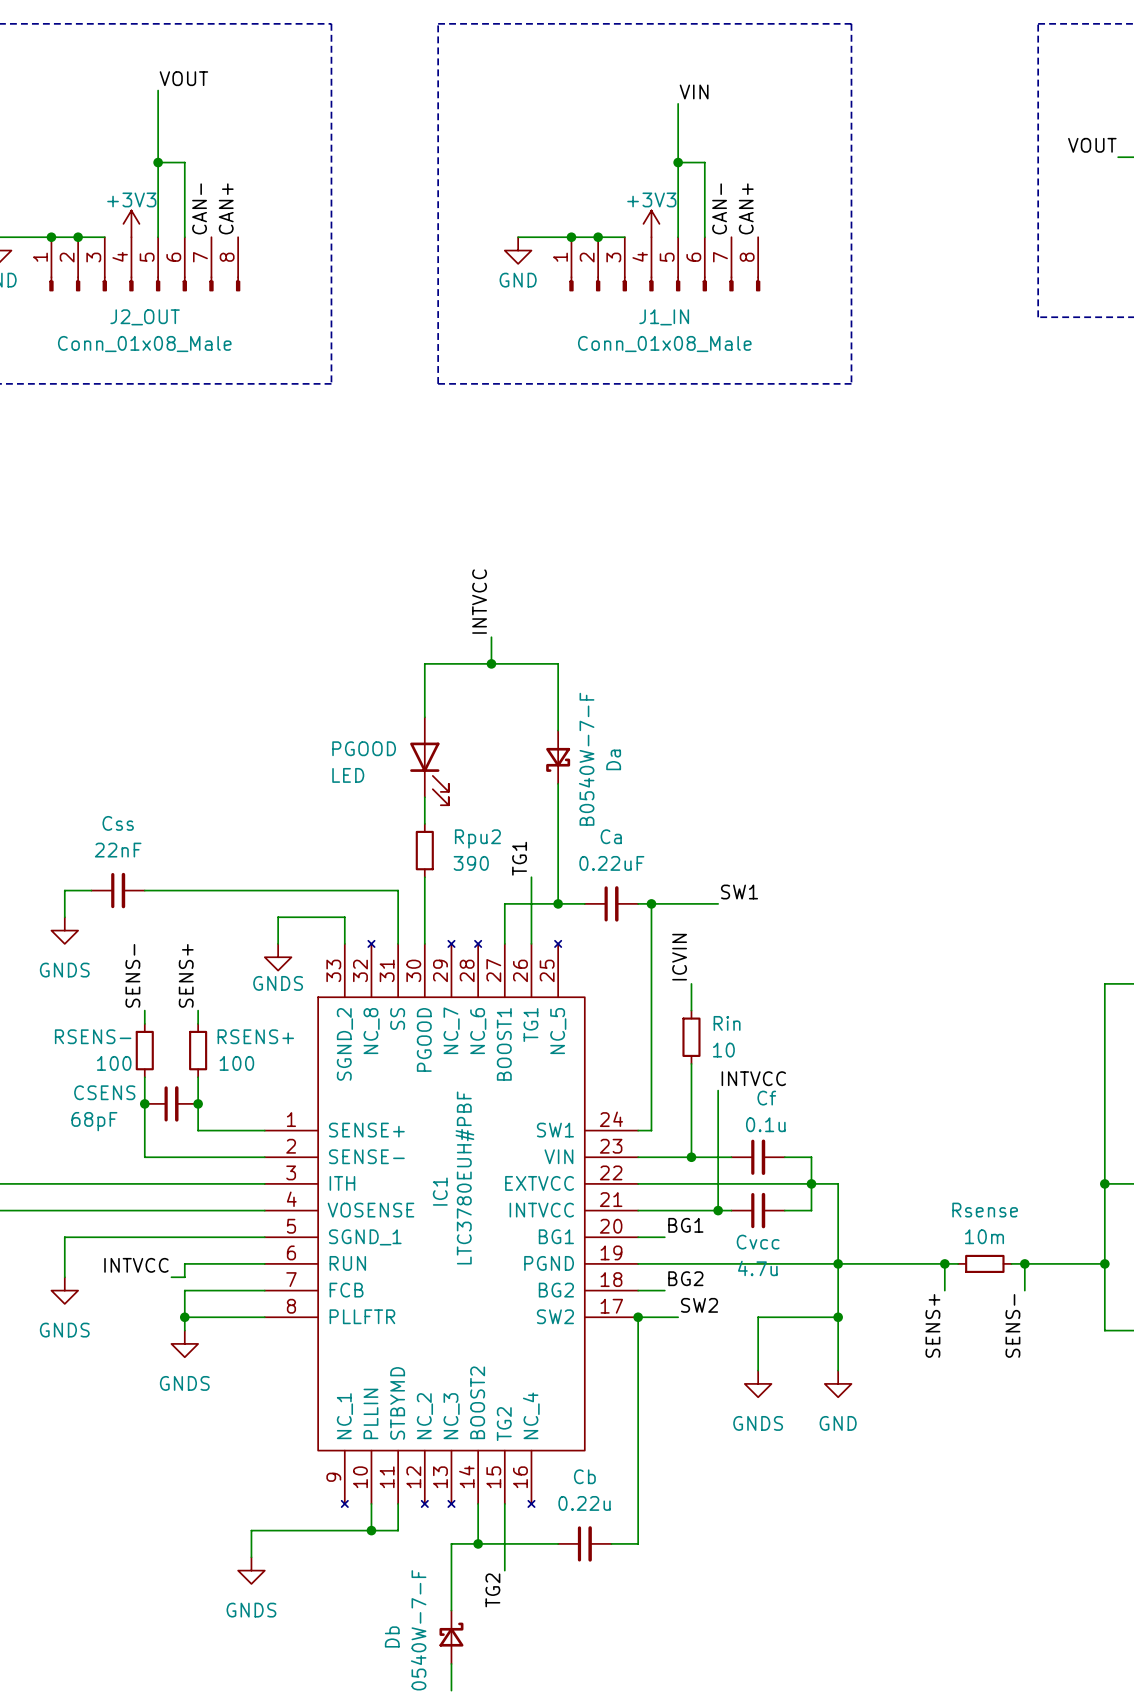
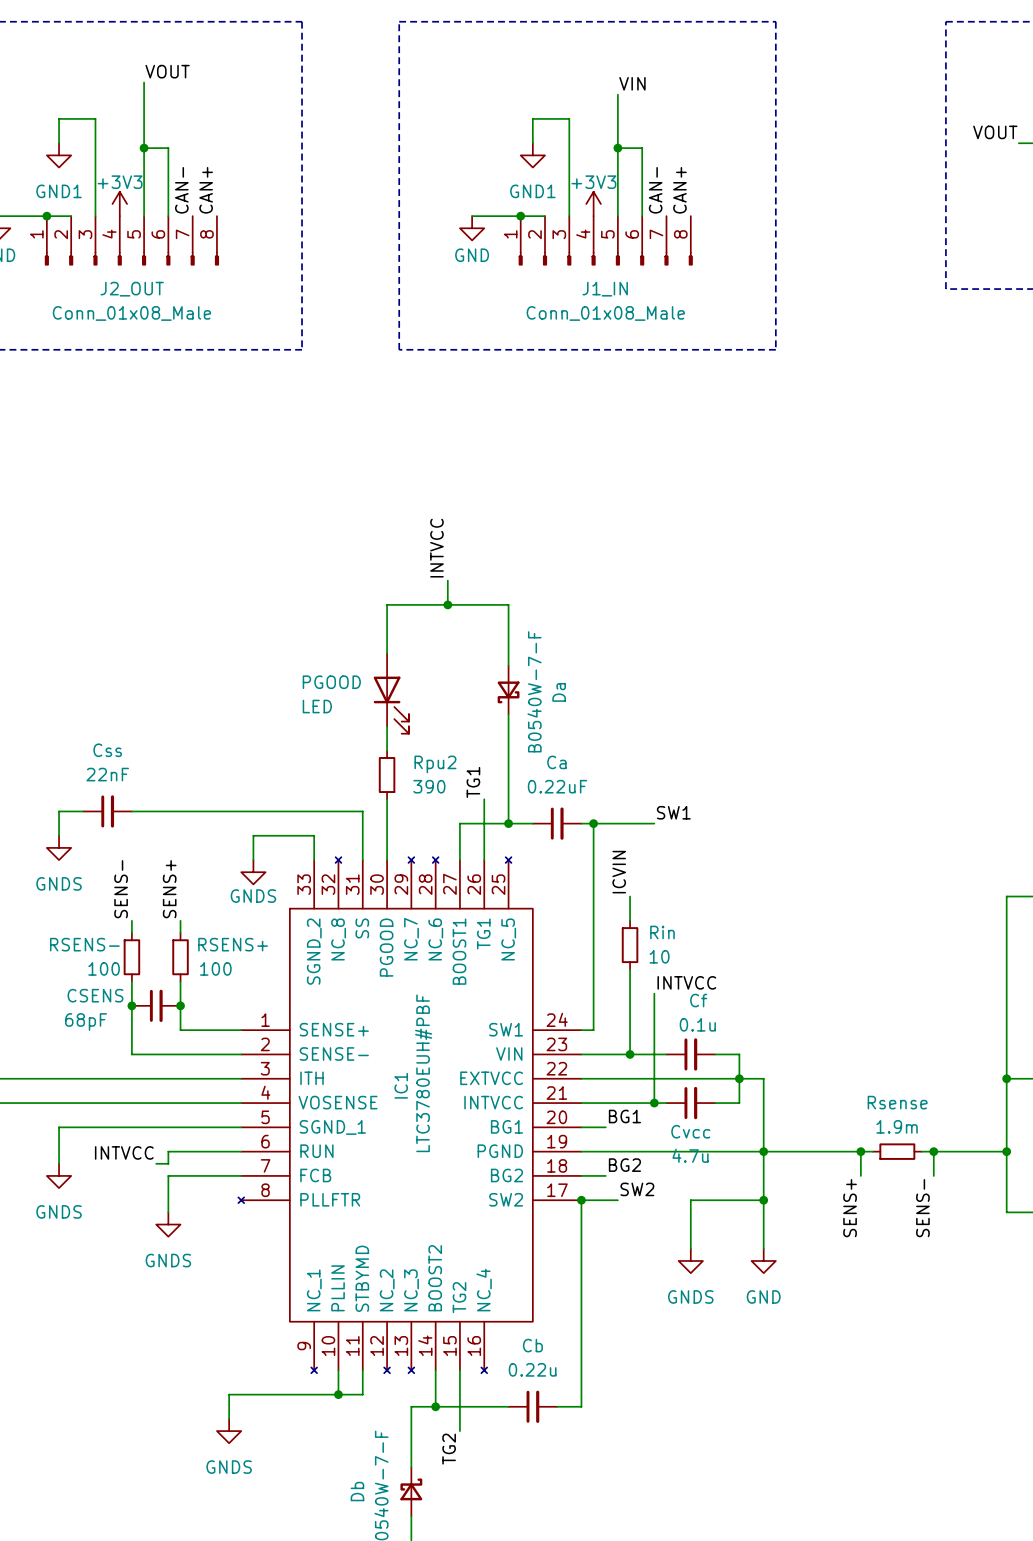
power symbol: none -> GND1 (59, 155)
power symbol: none -> GND1 (532, 155)
wire: (78, 237) (104, 237) -> (59, 143) (59, 118) (95, 118) (95, 216)
junction: (78, 237) -> none
wire: (598, 237) (624, 237) -> (532, 143) (532, 118) (569, 118) (569, 216)
junction: (598, 237) -> none
IC1 symbol: [264, 940, 639, 1508] -> [238, 857, 582, 1374]
Rsense value: 10m (984, 1236) -> 1.9m (897, 1126)
wire: (184, 1317) (264, 1317) -> none
junction: (184, 1317) -> none

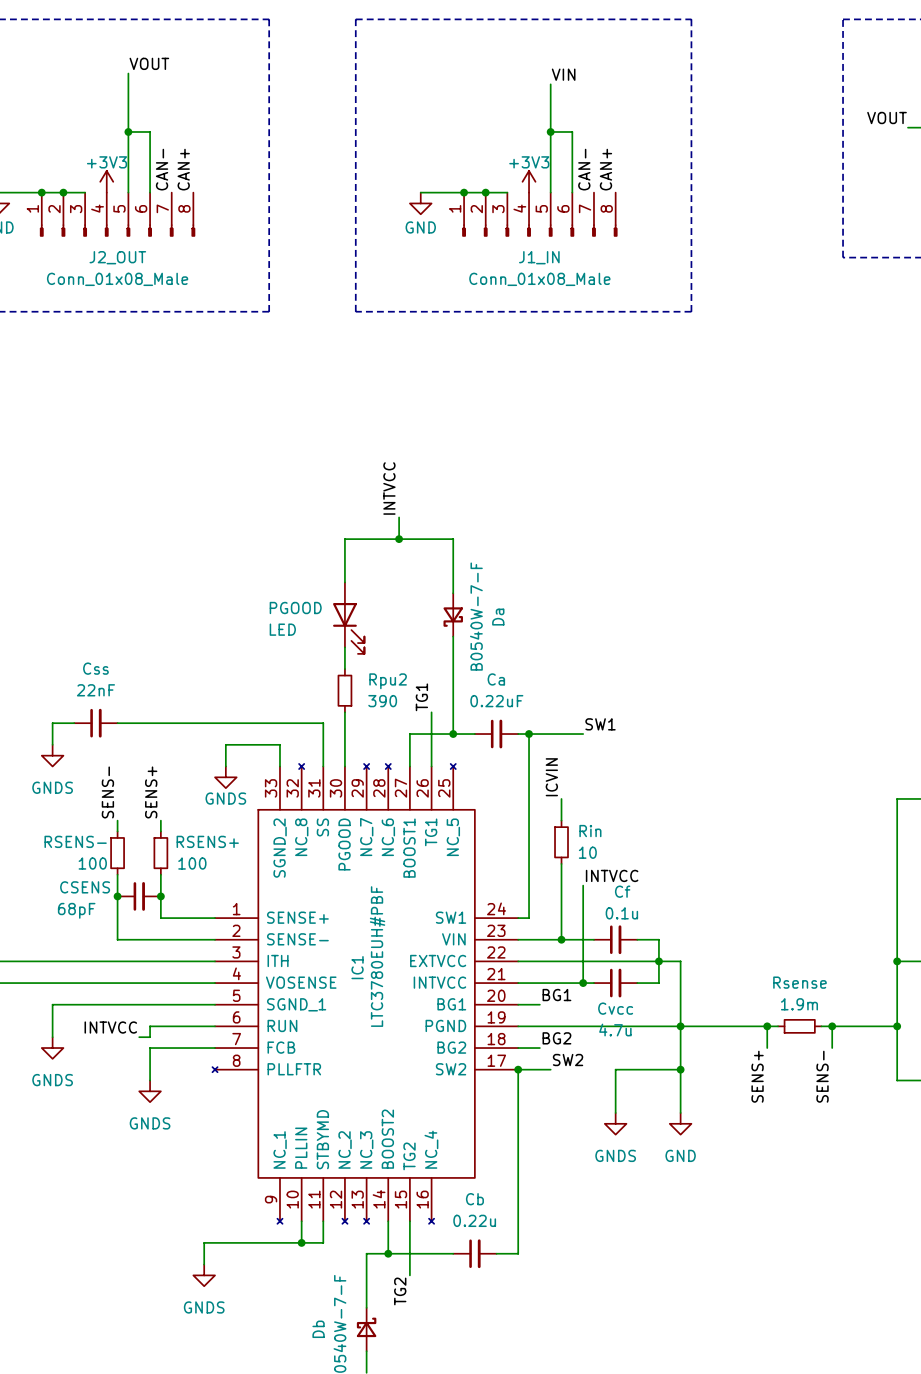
wire: (59, 143) (59, 118) (95, 118) (95, 216) -> (63, 192) (85, 192)
wire: (532, 143) (532, 118) (569, 118) (569, 216) -> (485, 192) (507, 192)
power symbol: GND1 (59, 155) -> none
power symbol: GND1 (532, 155) -> none
junction: none -> (63, 192)
junction: none -> (485, 192)

